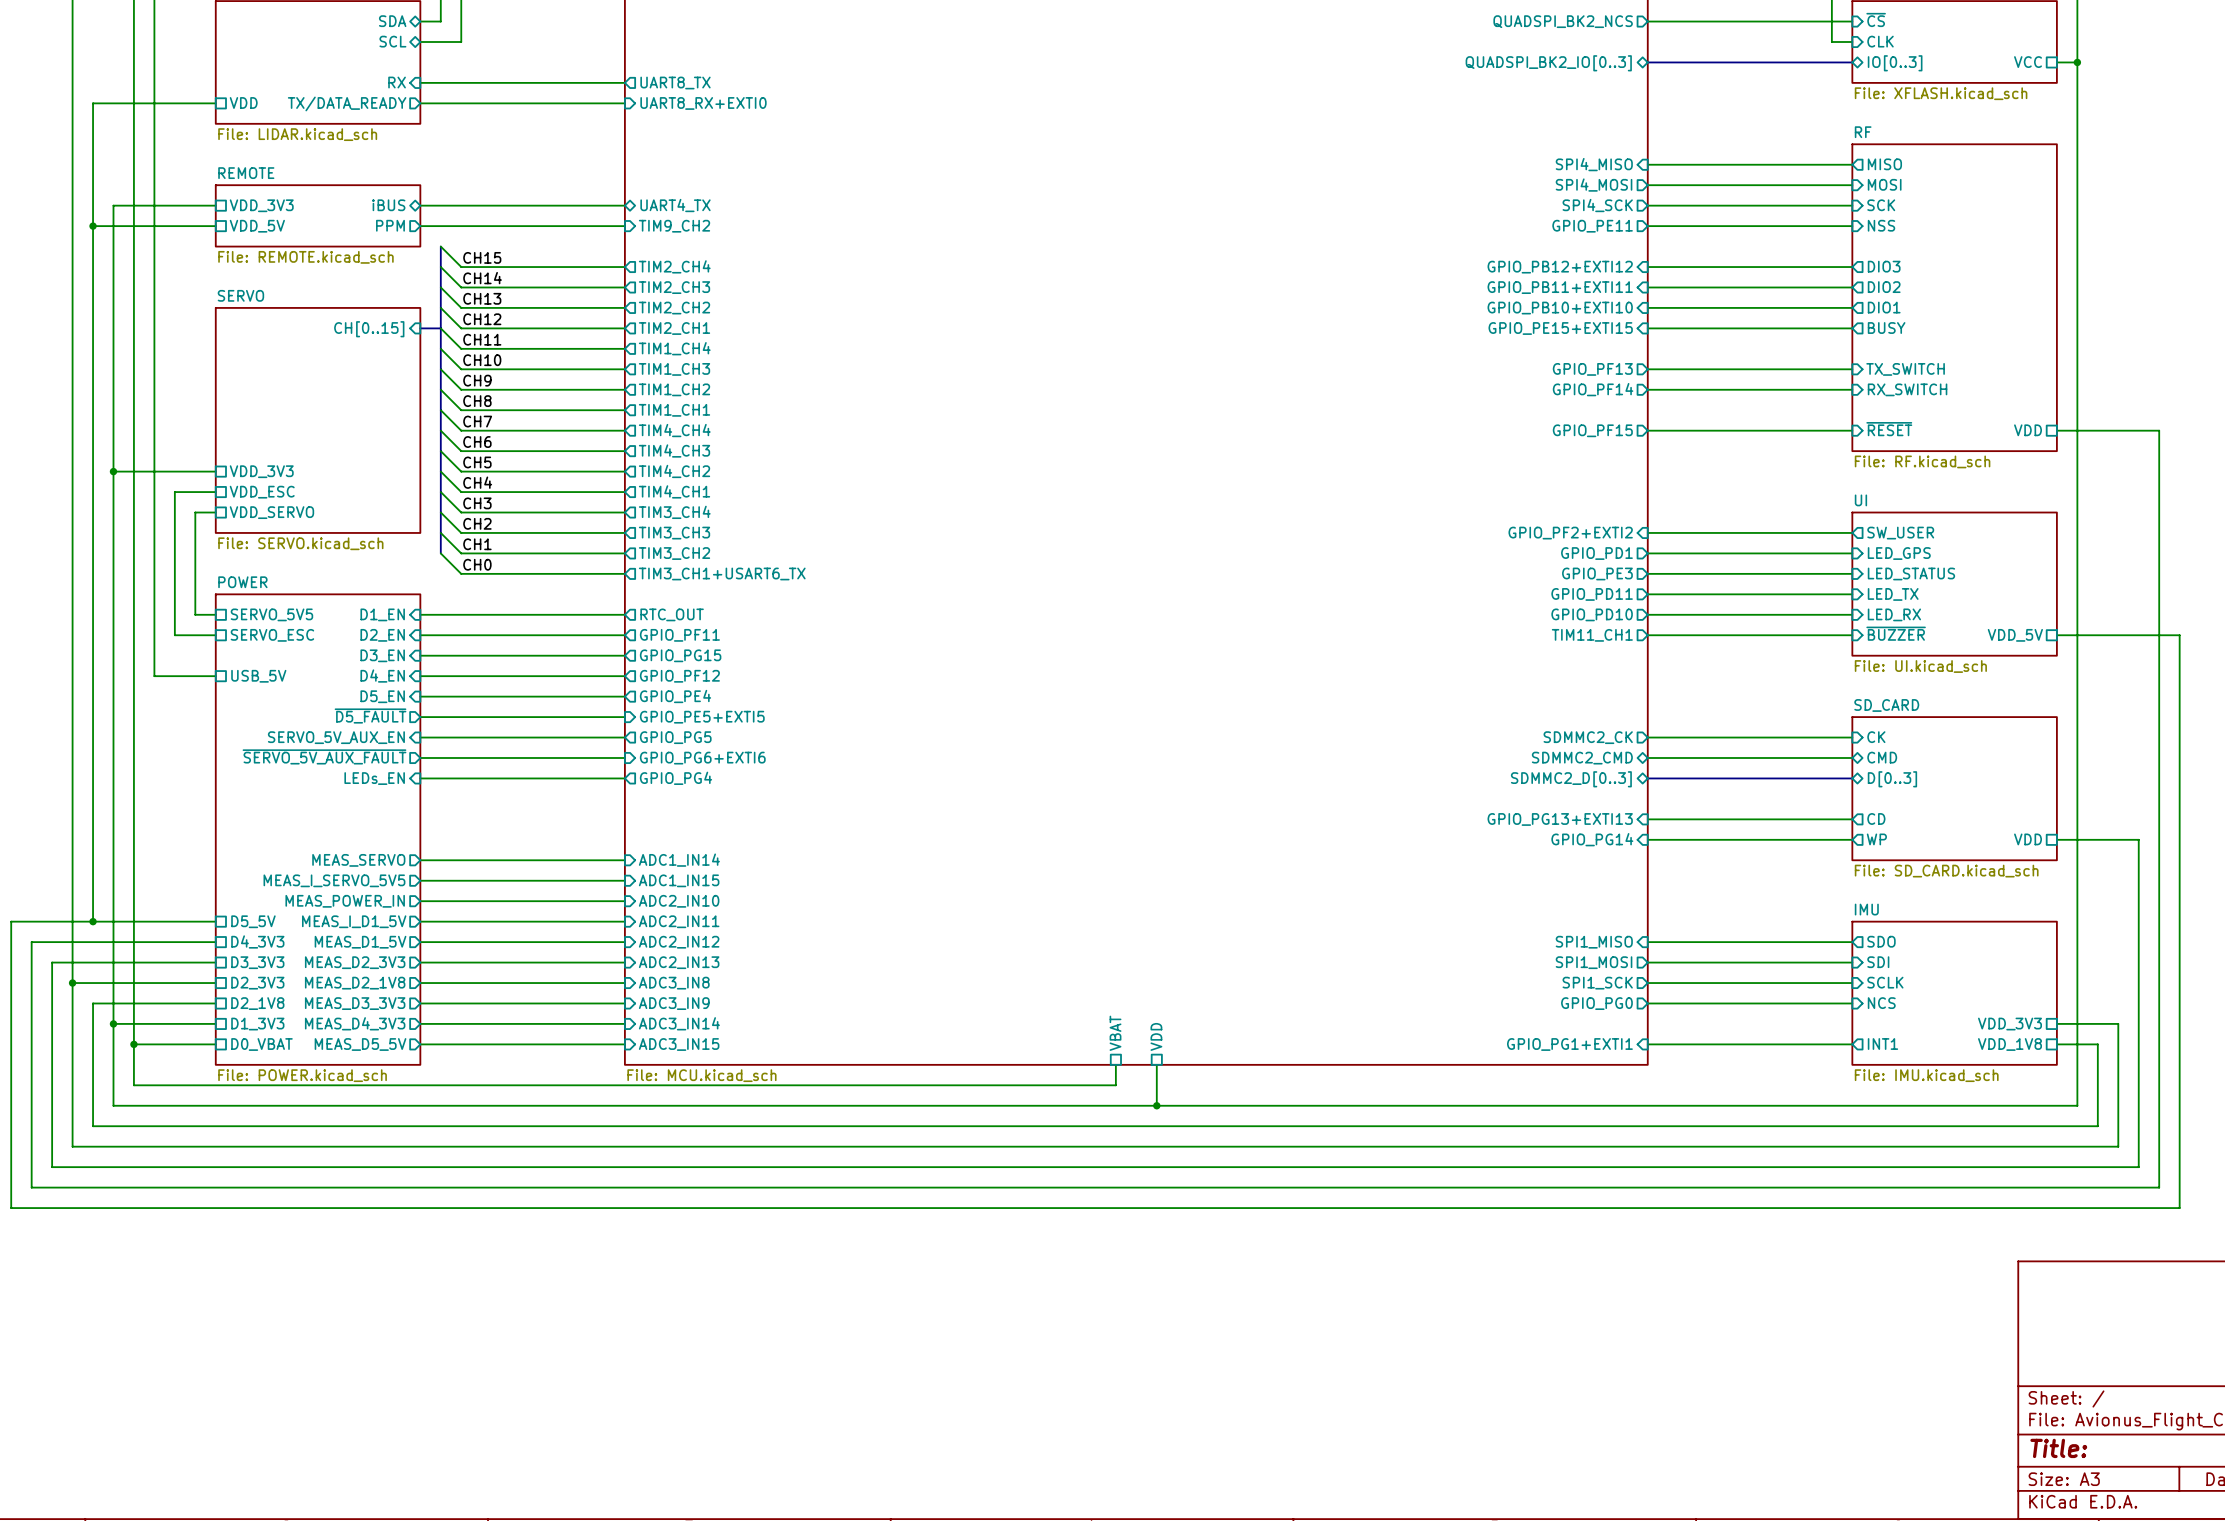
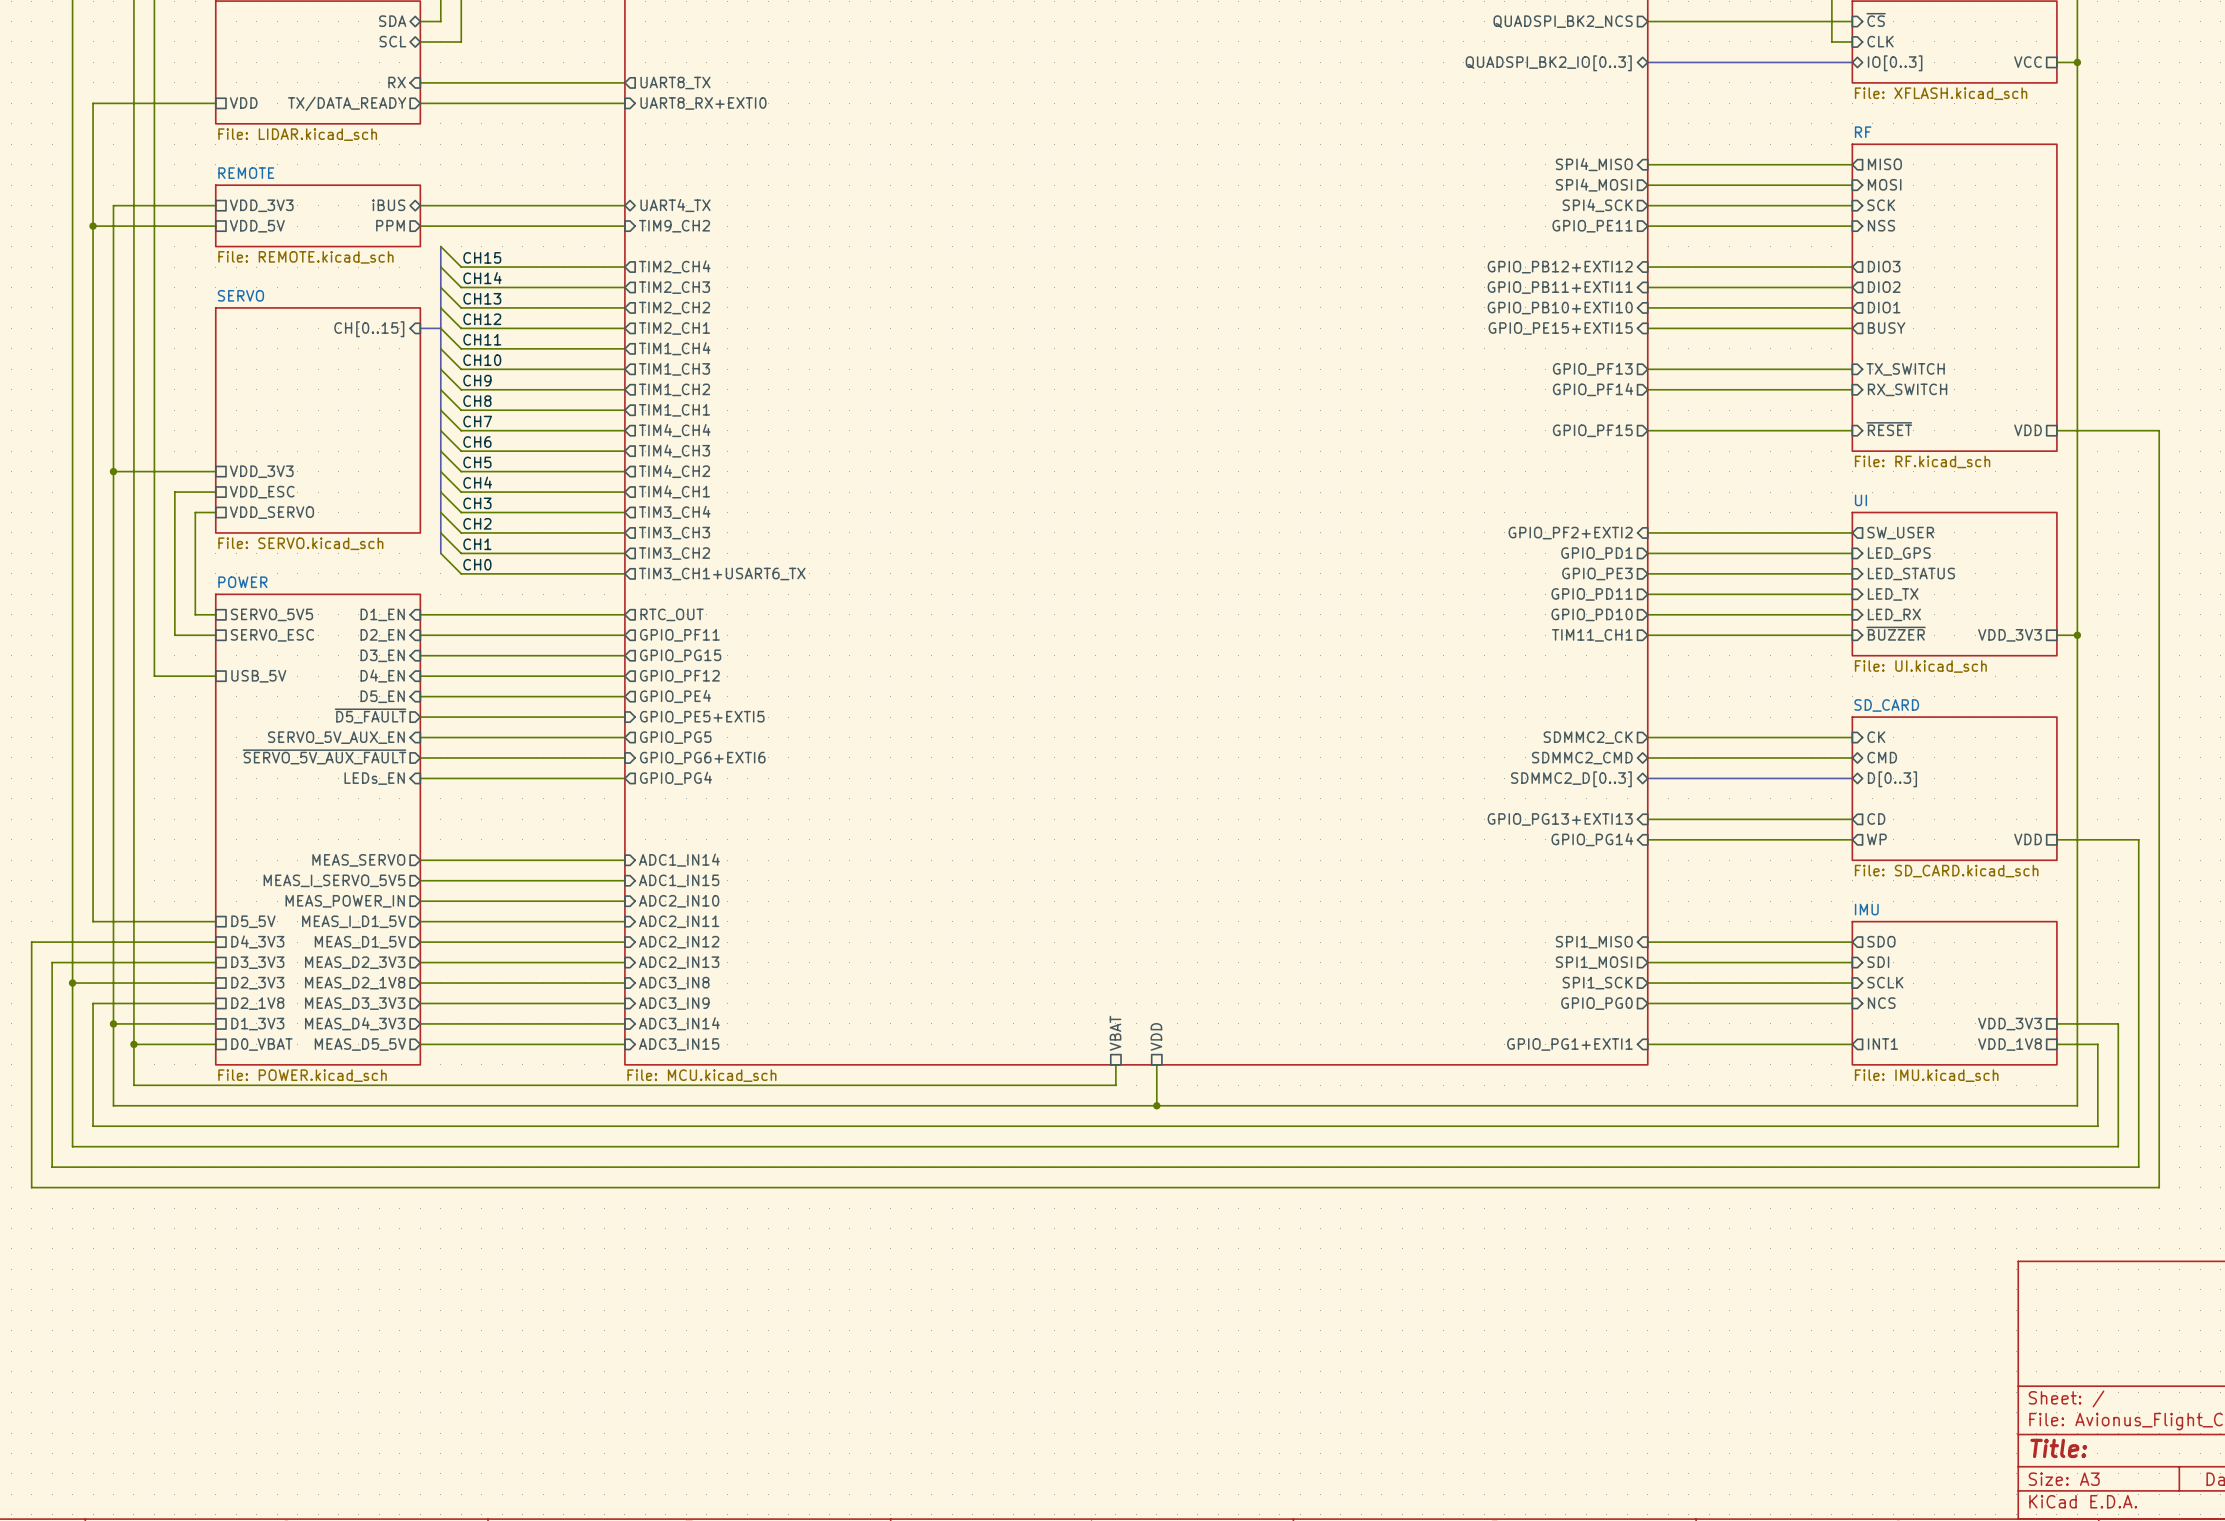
sheet pin: VDD_5V (2015, 635) -> VDD_3V3 (2010, 635)
wire: (2077, 635) (2179, 635) (2179, 1208) (11, 1208) (11, 921) (93, 921) -> none
junction: none -> (2077, 635)
junction: (93, 921) -> none

